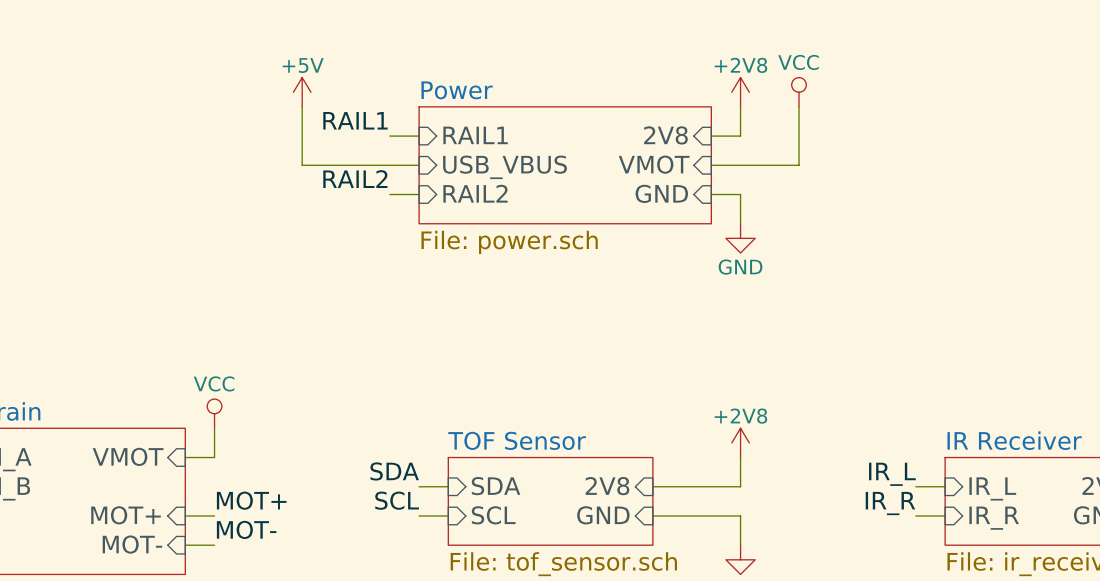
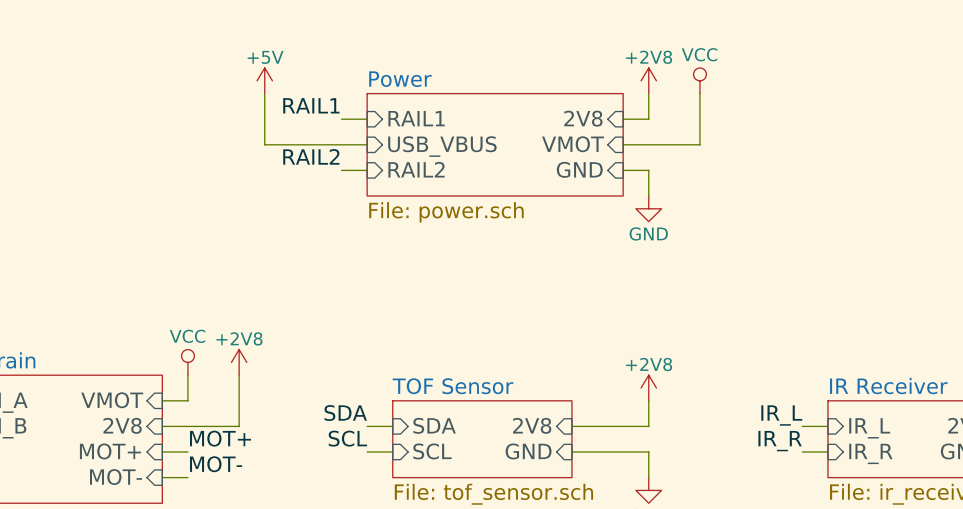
power symbol: none -> +2V8 (239, 362)
wire: none -> (239, 375) (239, 426) (162, 426)
sheet pin: none -> 2V8 (122, 425)

